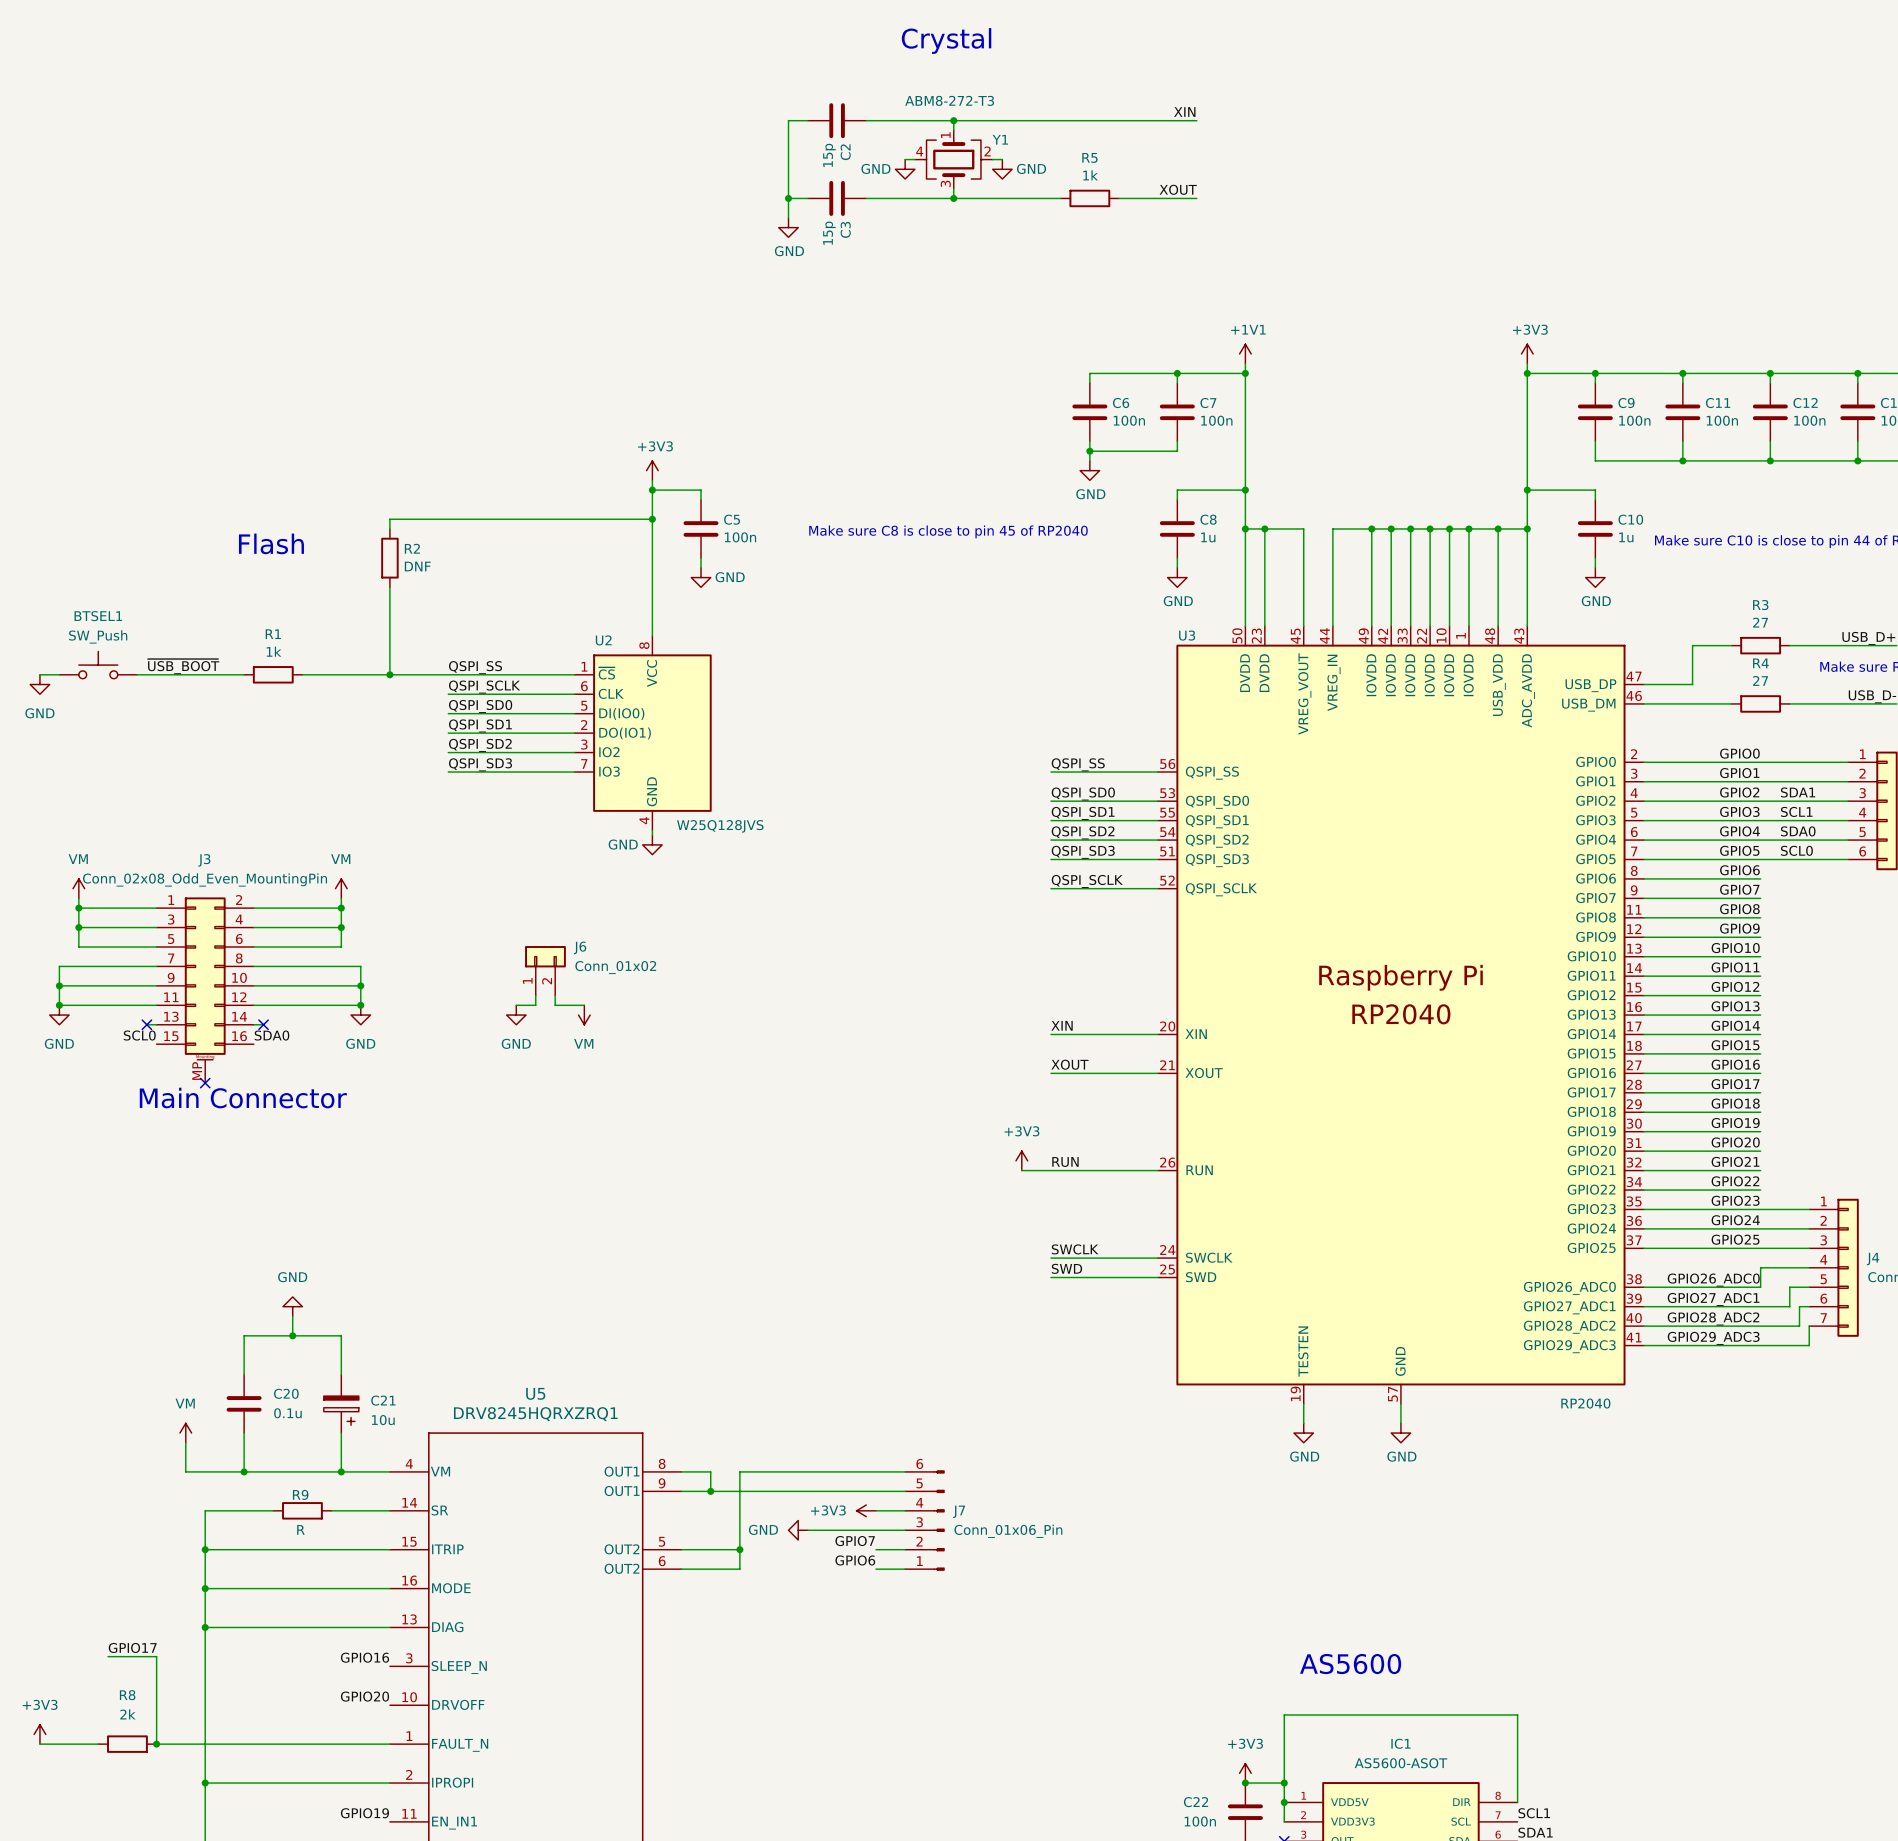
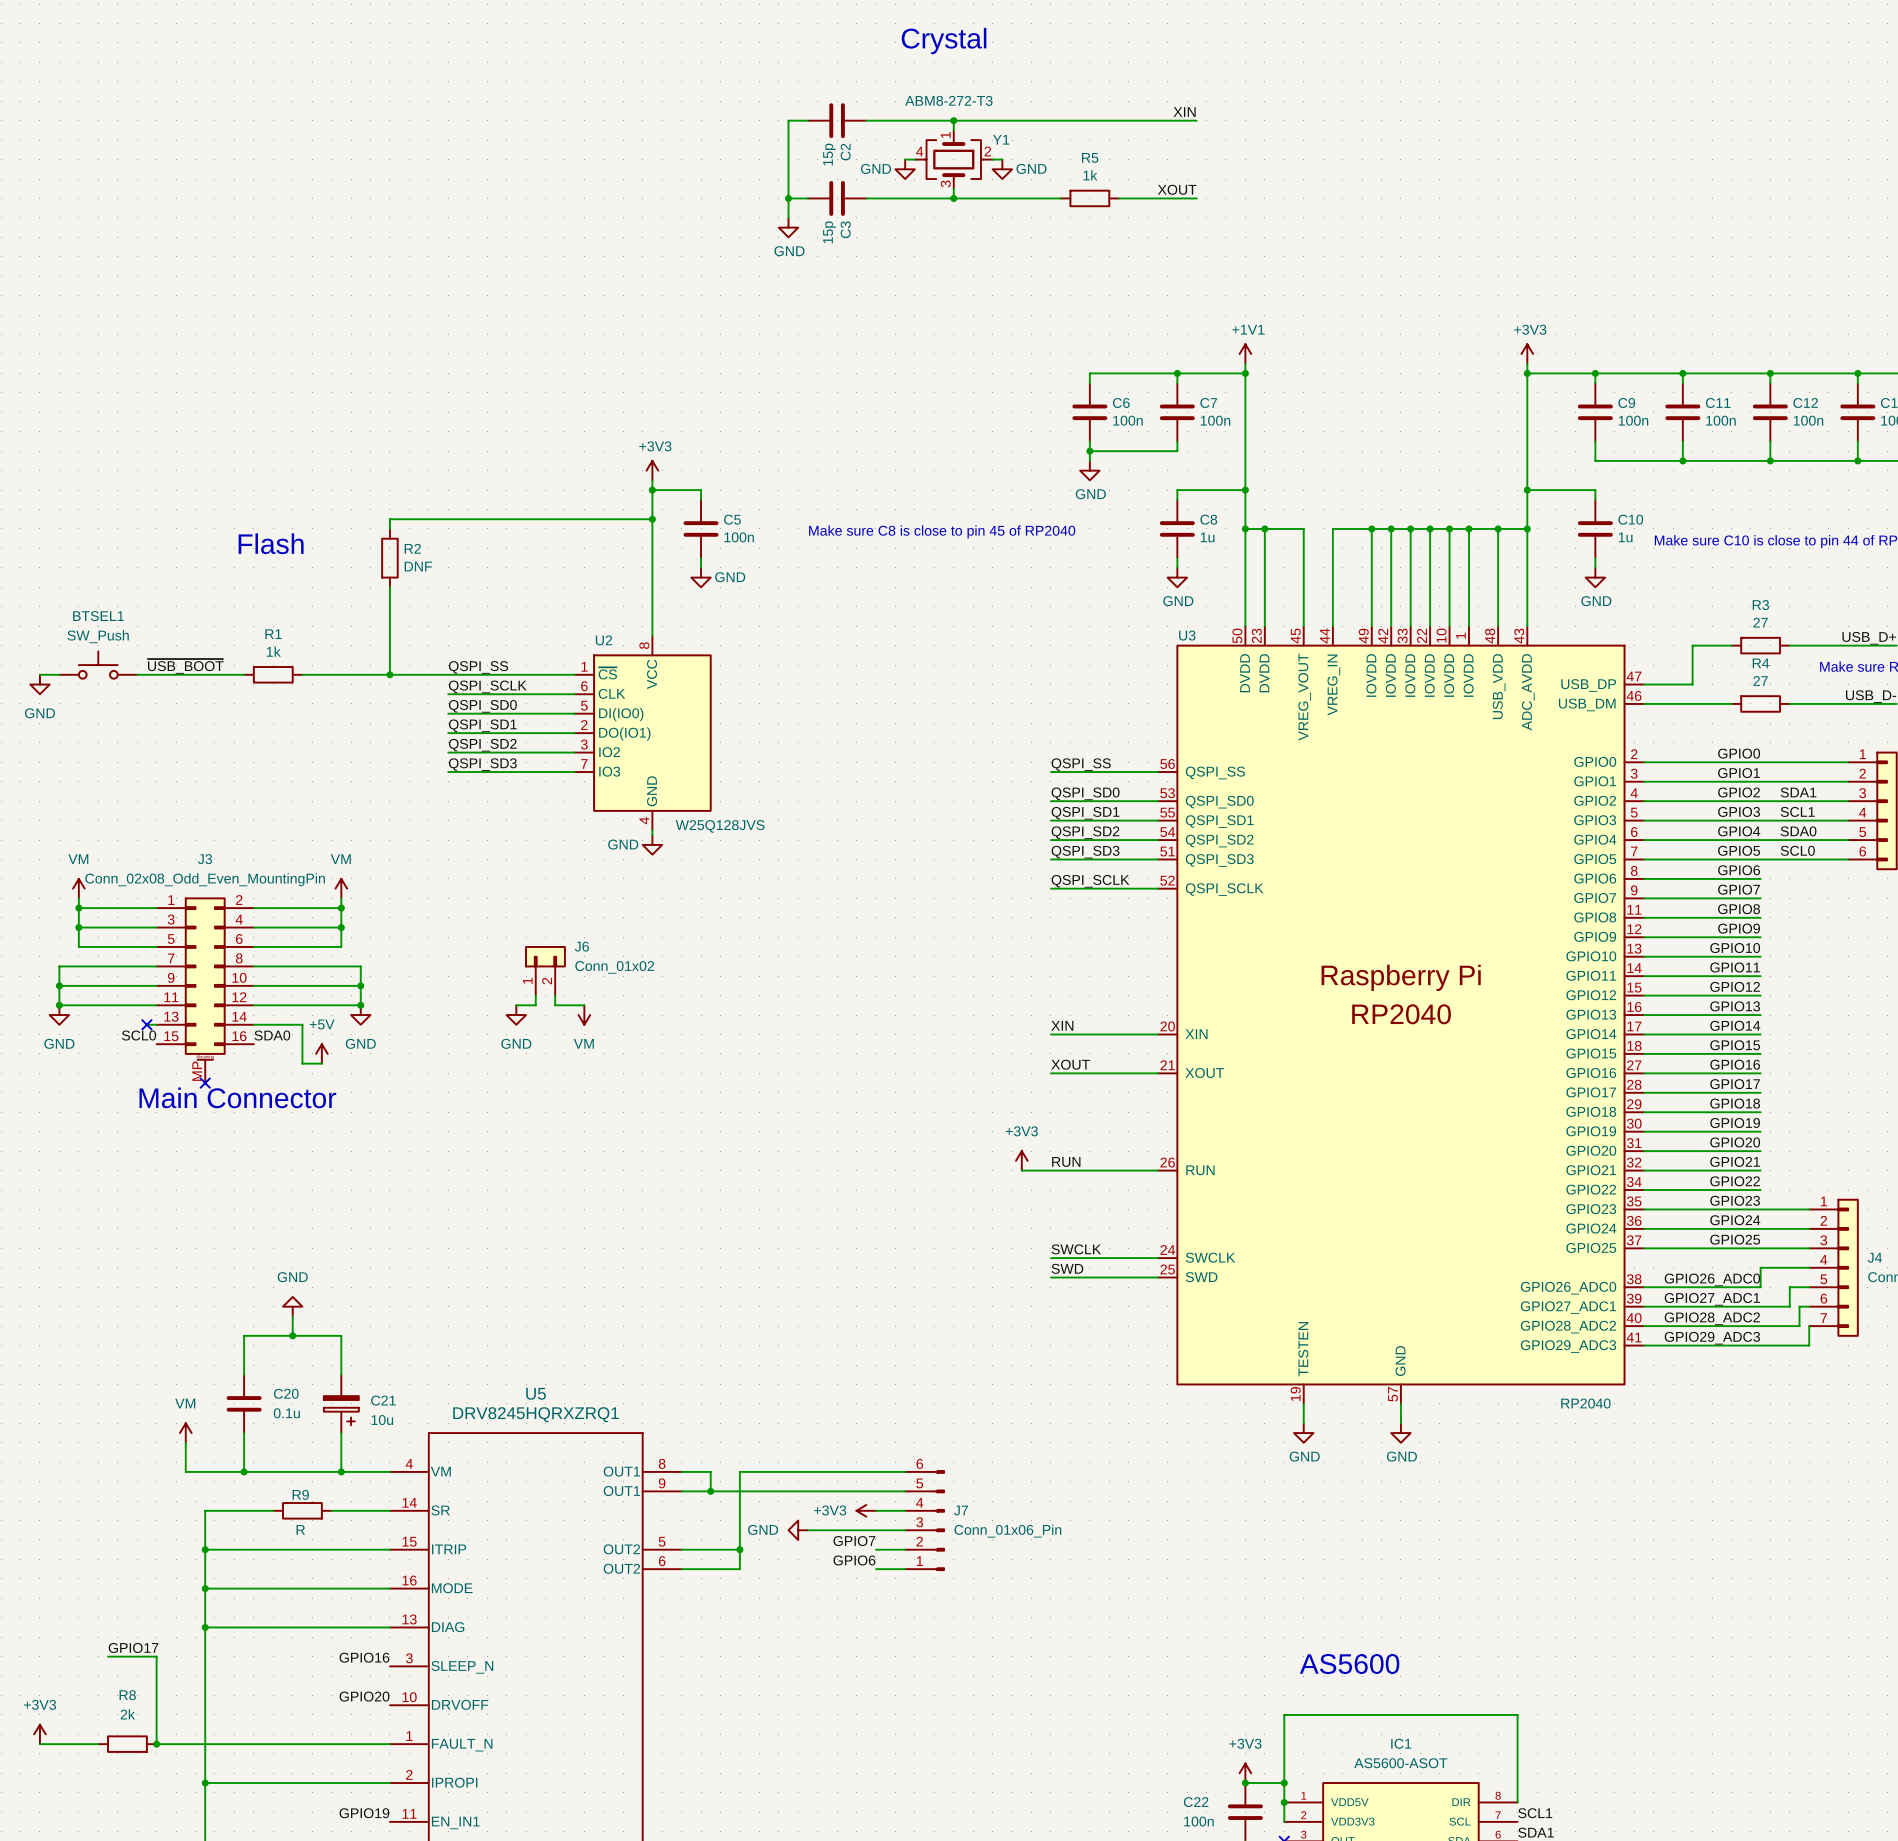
wire: none -> (263, 1024) (302, 1024) (302, 1063) (321, 1063)
no-connect mark: (263, 1024) -> none
power symbol: none -> +5V (321, 1053)

